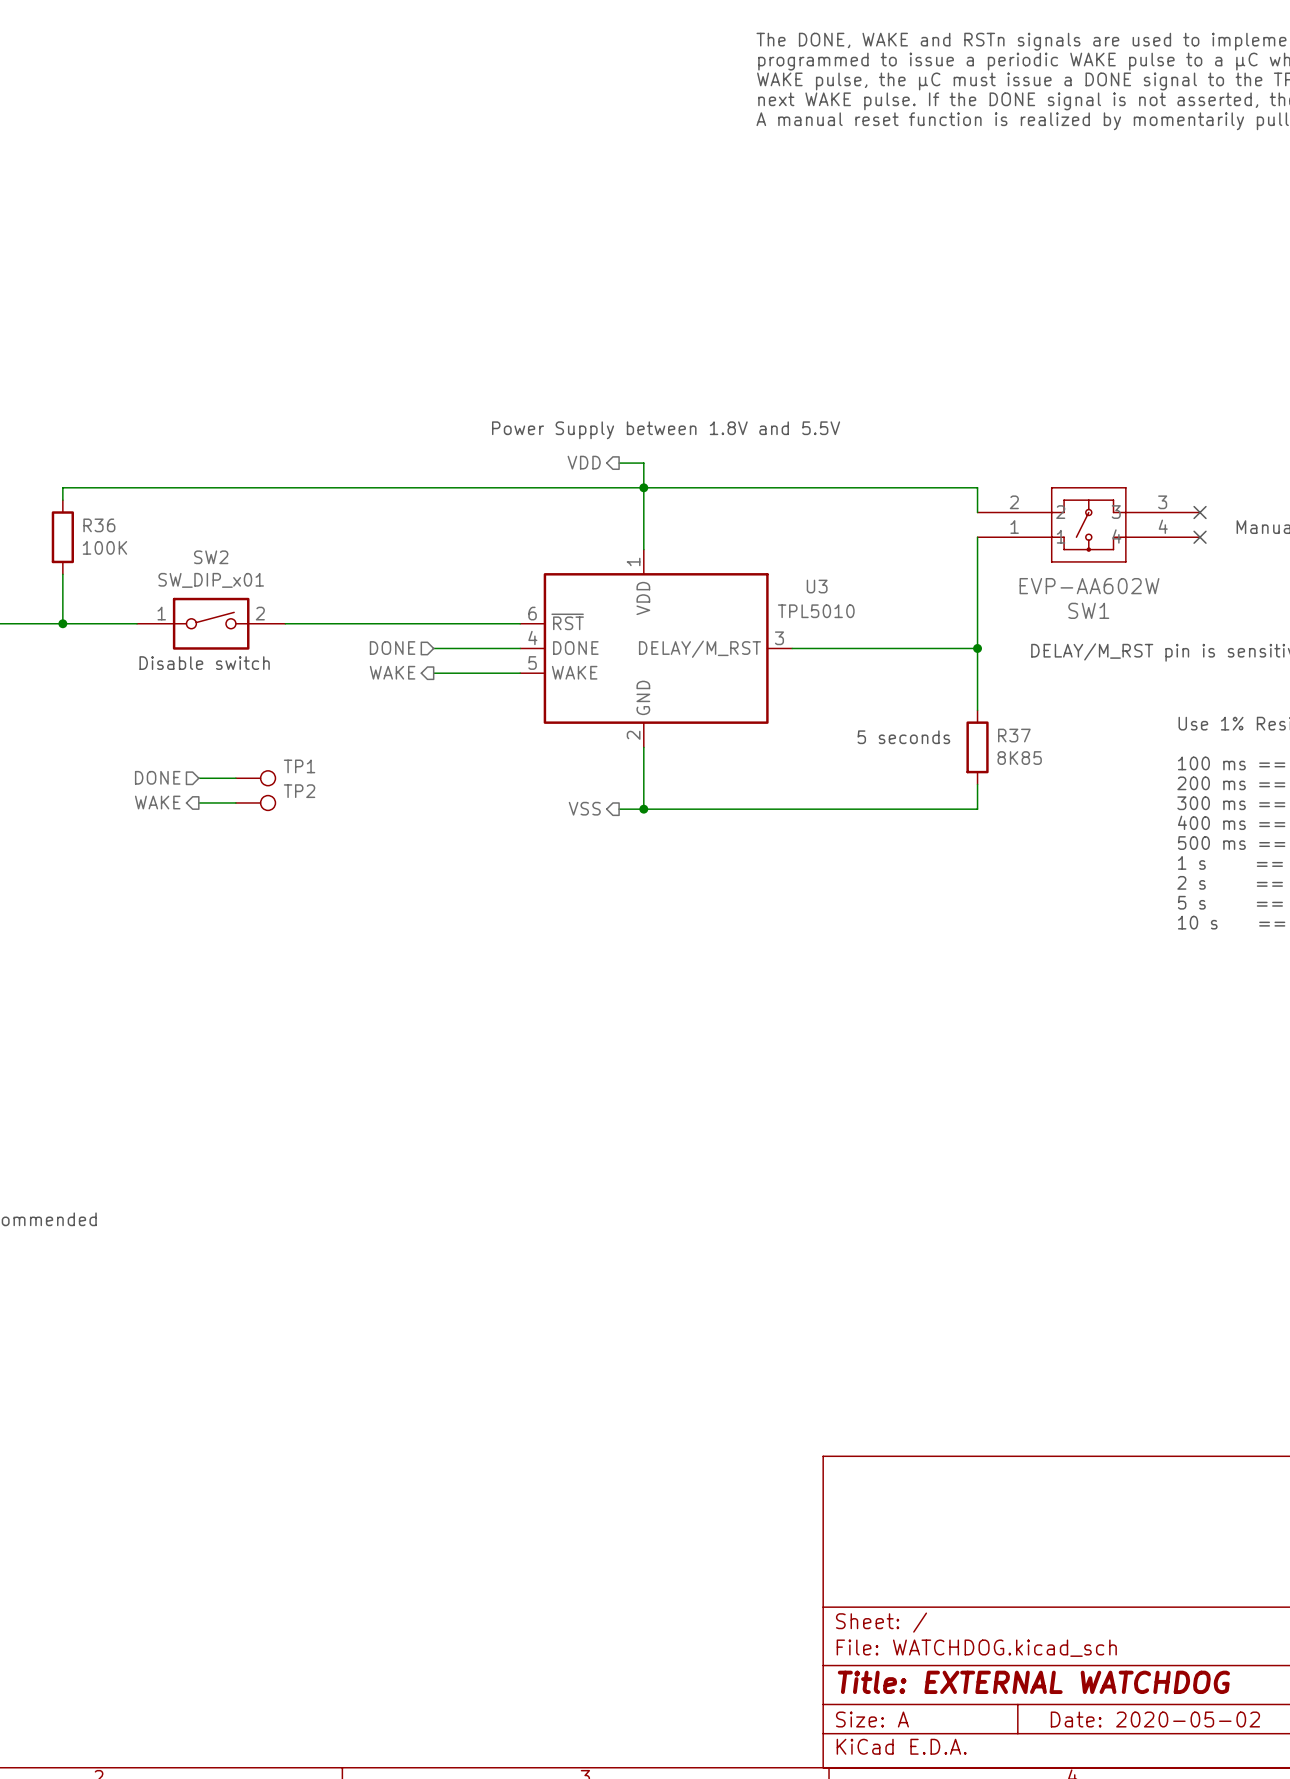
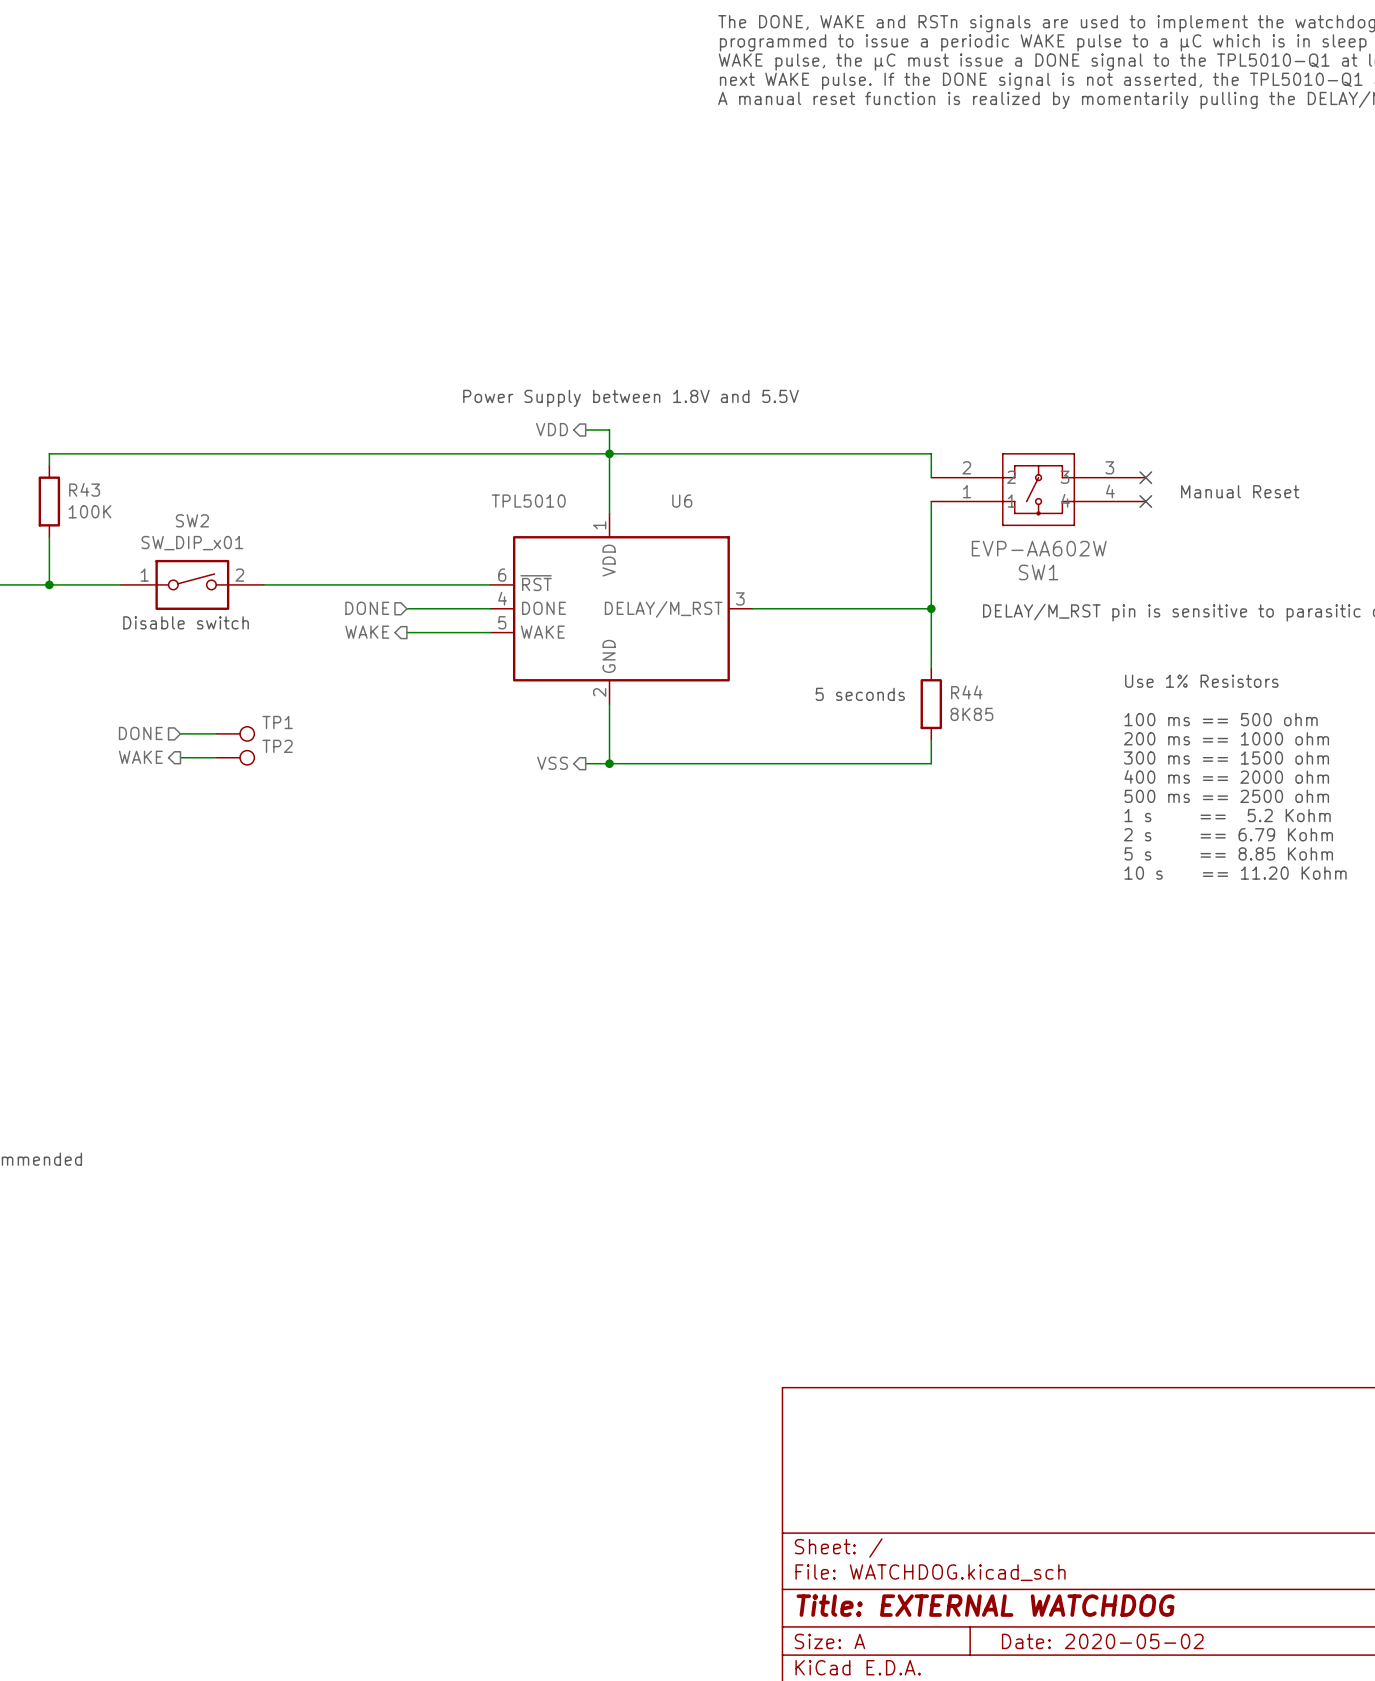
R36 name: R36 (99, 525) -> R43 (84, 489)
U3 name: U3 (817, 586) -> U6 (682, 501)
U3 value position: TPL5010 (816, 611) -> TPL5010 (528, 501)
R37 name: R37 (1014, 735) -> R44 (966, 692)

